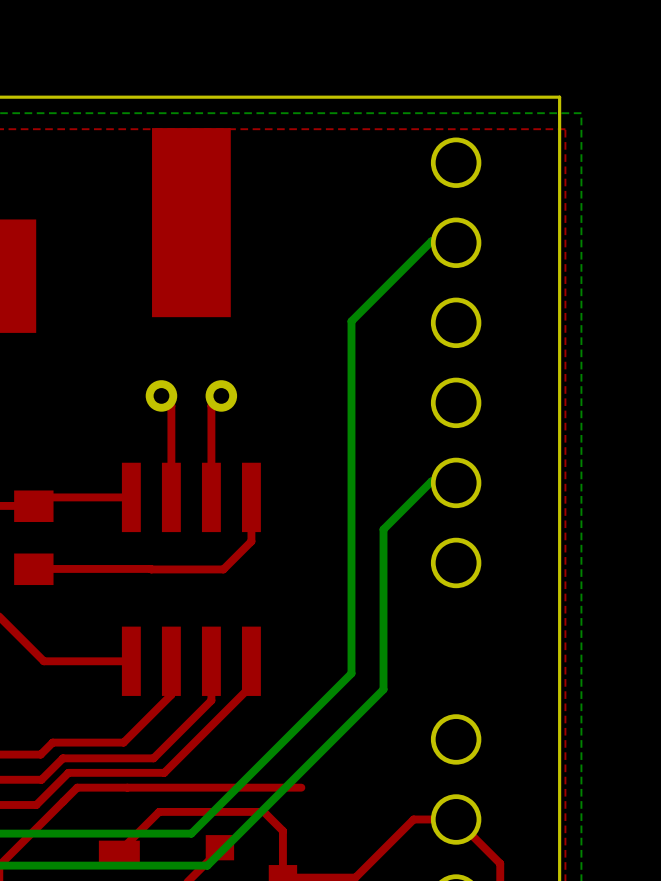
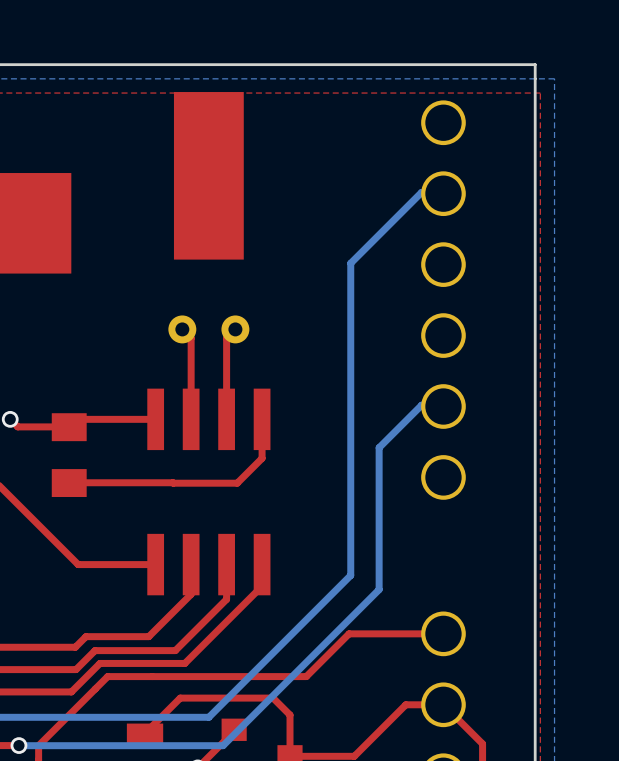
top track: none -> (443, 633) (349, 633) (306, 676)

